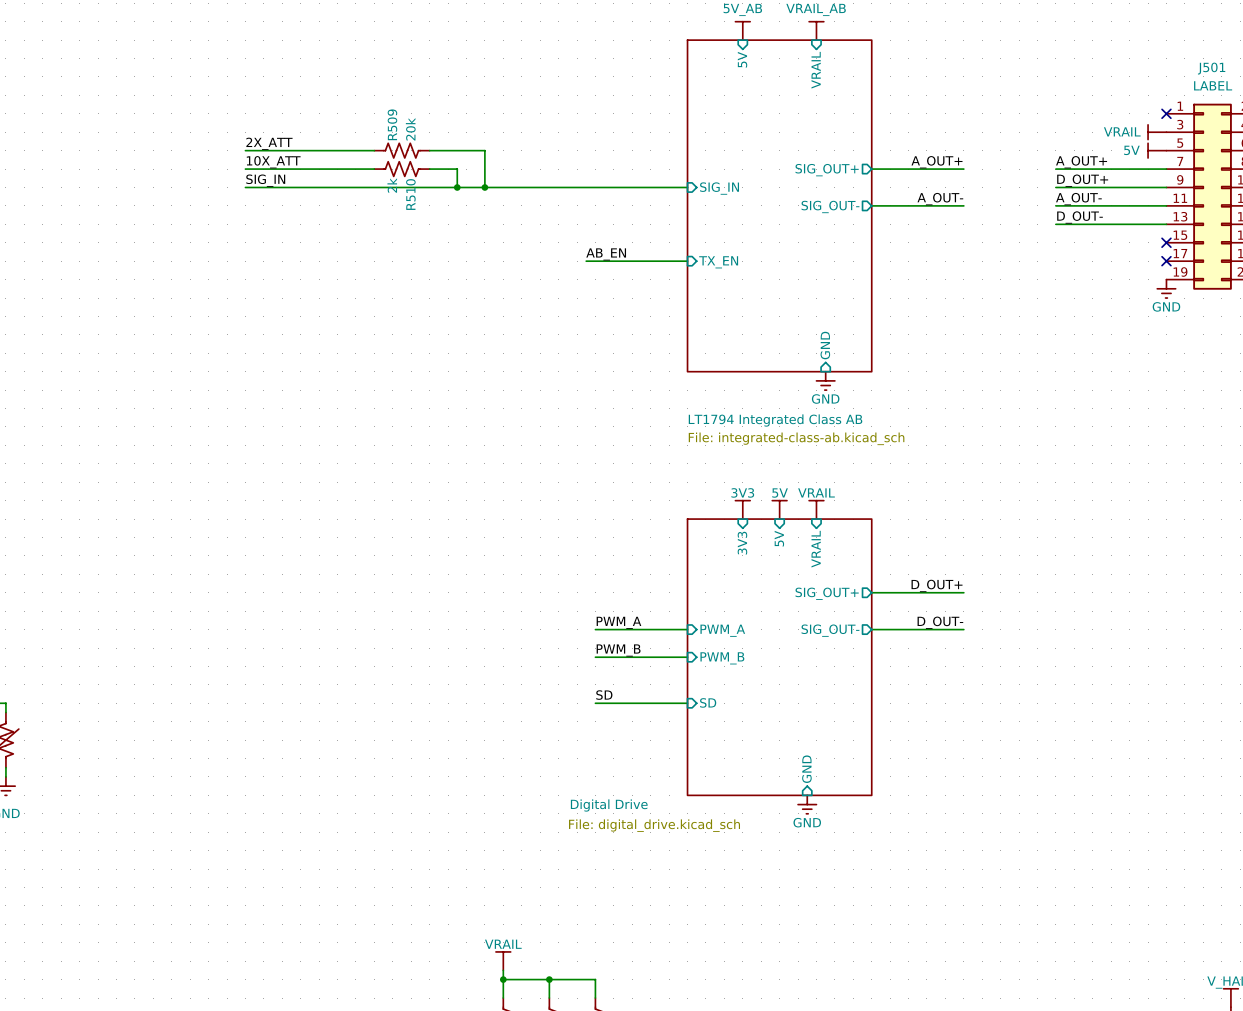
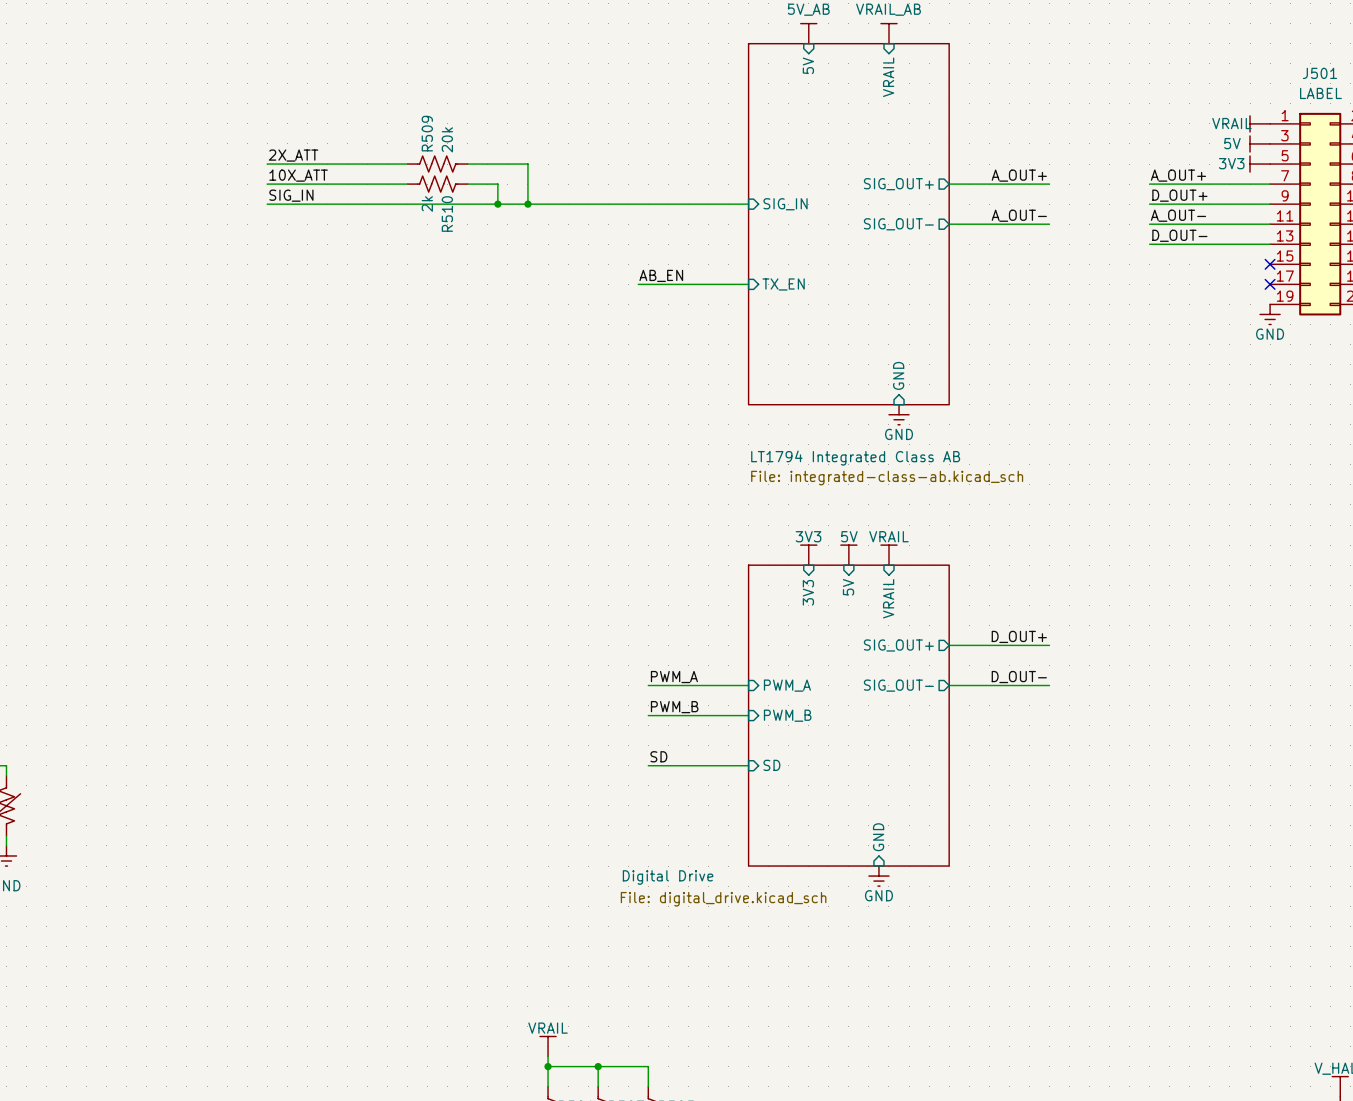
power symbol: none -> VRAIL (1260, 123)
no-connect mark: (1166, 113) -> none
power symbol: VRAIL (1157, 132) -> 5V (1260, 143)
power symbol: 5V (1157, 150) -> 3V3 (1260, 164)

